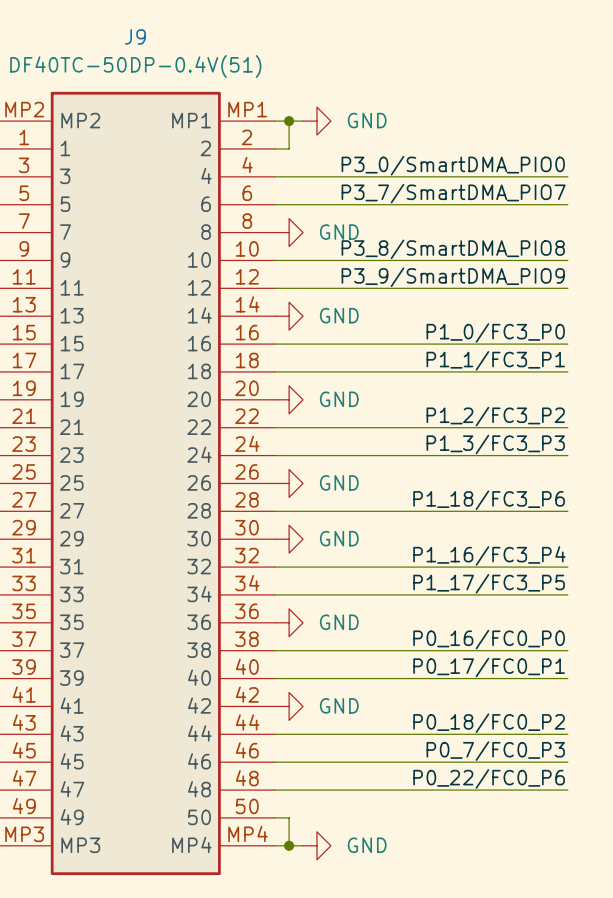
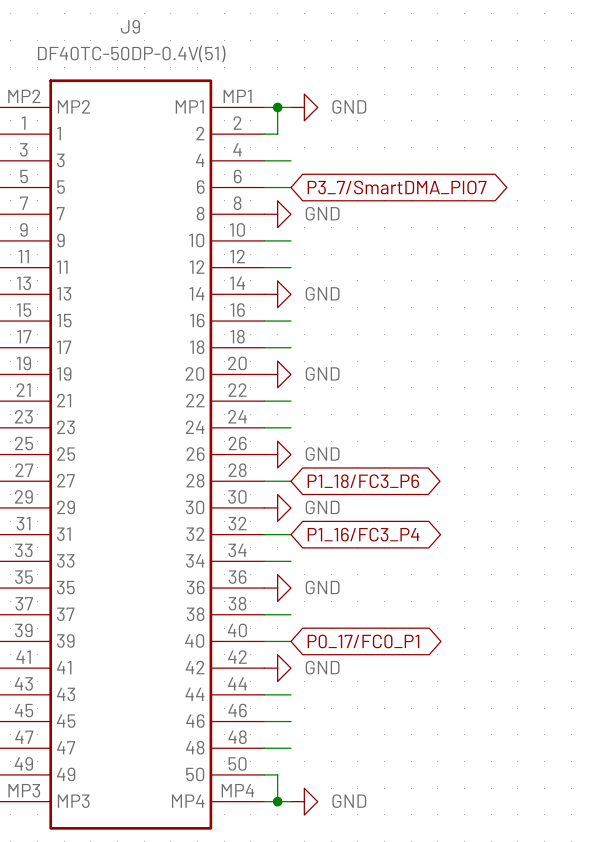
label: P3_0/SmartDMA_PIO0 (453, 165) -> none
wire: (303, 176) (567, 176) -> none
label: P3_7/SmartDMA_PIO7 (453, 193) -> none
wire: (303, 204) (567, 204) -> none
global label: none -> P3_7/SmartDMA_PIO7 (397, 187)
label: P3_8/SmartDMA_PIO8 (453, 249) -> none
wire: (303, 260) (567, 260) -> none
label: P3_9/SmartDMA_PIO9 (453, 277) -> none
wire: (303, 288) (567, 288) -> none
label: P1_0/FC3_P0 (495, 332) -> none
wire: (303, 344) (567, 344) -> none
label: P1_1/FC3_P1 (495, 360) -> none
wire: (303, 371) (567, 371) -> none
label: P1_2/FC3_P2 (495, 416) -> none
wire: (303, 427) (567, 427) -> none
label: P1_3/FC3_P3 (495, 444) -> none
wire: (303, 455) (567, 455) -> none
label: P1_18/FC3_P6 (489, 500) -> none
wire: (303, 511) (567, 511) -> none
global label: none -> P1_18/FC3_P6 (363, 481)
label: P1_16/FC3_P4 (489, 555) -> none
wire: (303, 567) (567, 567) -> none
global label: none -> P1_16/FC3_P4 (363, 534)
label: P1_17/FC3_P5 (489, 583) -> none
wire: (303, 594) (567, 594) -> none
label: P0_16/FC0_P0 (489, 639) -> none
wire: (303, 650) (567, 650) -> none
label: P0_17/FC0_P1 (489, 667) -> none
wire: (303, 678) (567, 678) -> none
global label: none -> P0_17/FC0_P1 (363, 641)
label: P0_18/FC0_P2 (489, 723) -> none
wire: (303, 734) (567, 734) -> none
label: P0_7/FC0_P3 (495, 751) -> none
wire: (303, 762) (567, 762) -> none
label: P0_22/FC0_P6 (489, 778) -> none
wire: (303, 790) (567, 790) -> none

